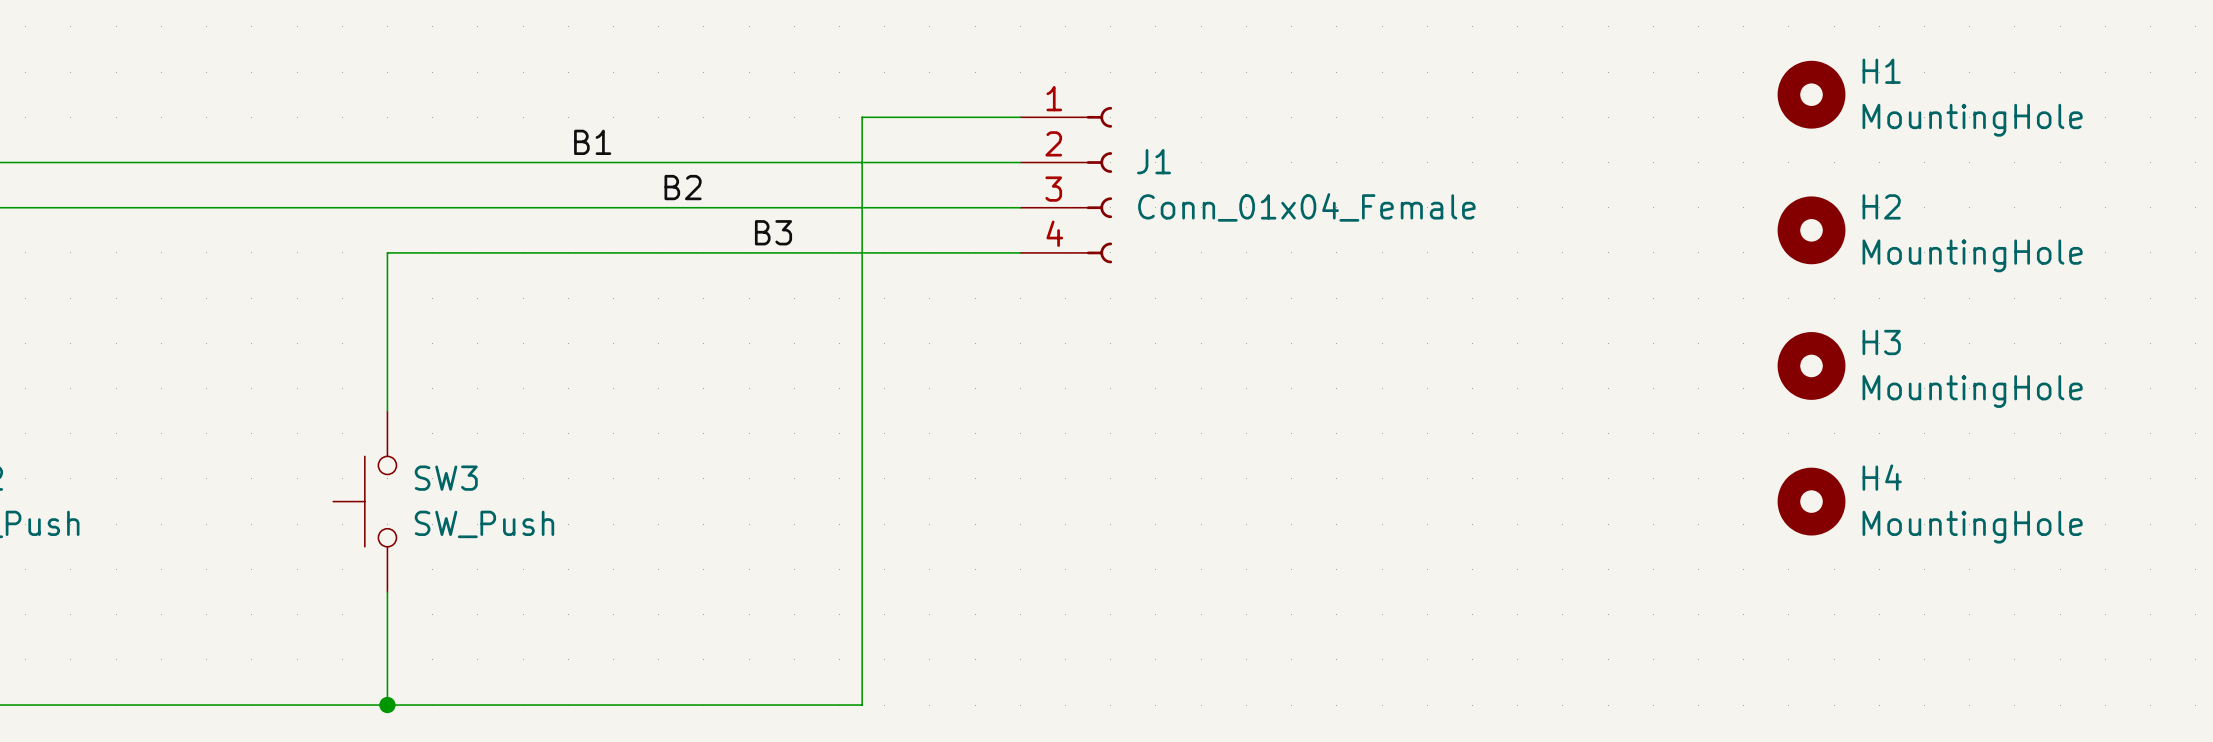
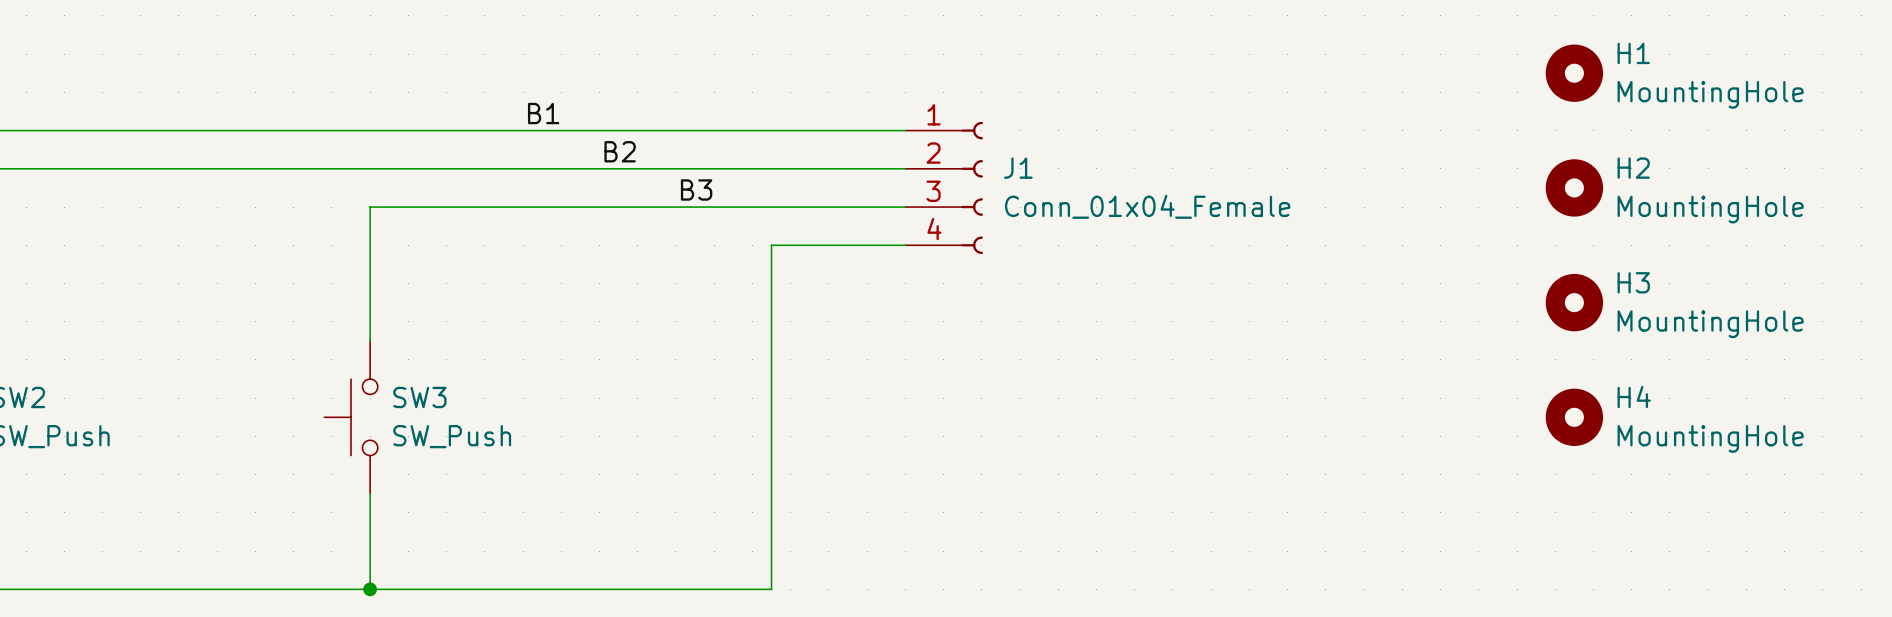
wire: (1020, 117) (862, 117) (862, 298) -> (905, 245) (771, 245)
J1 position: (1066, 185) -> (944, 187)

